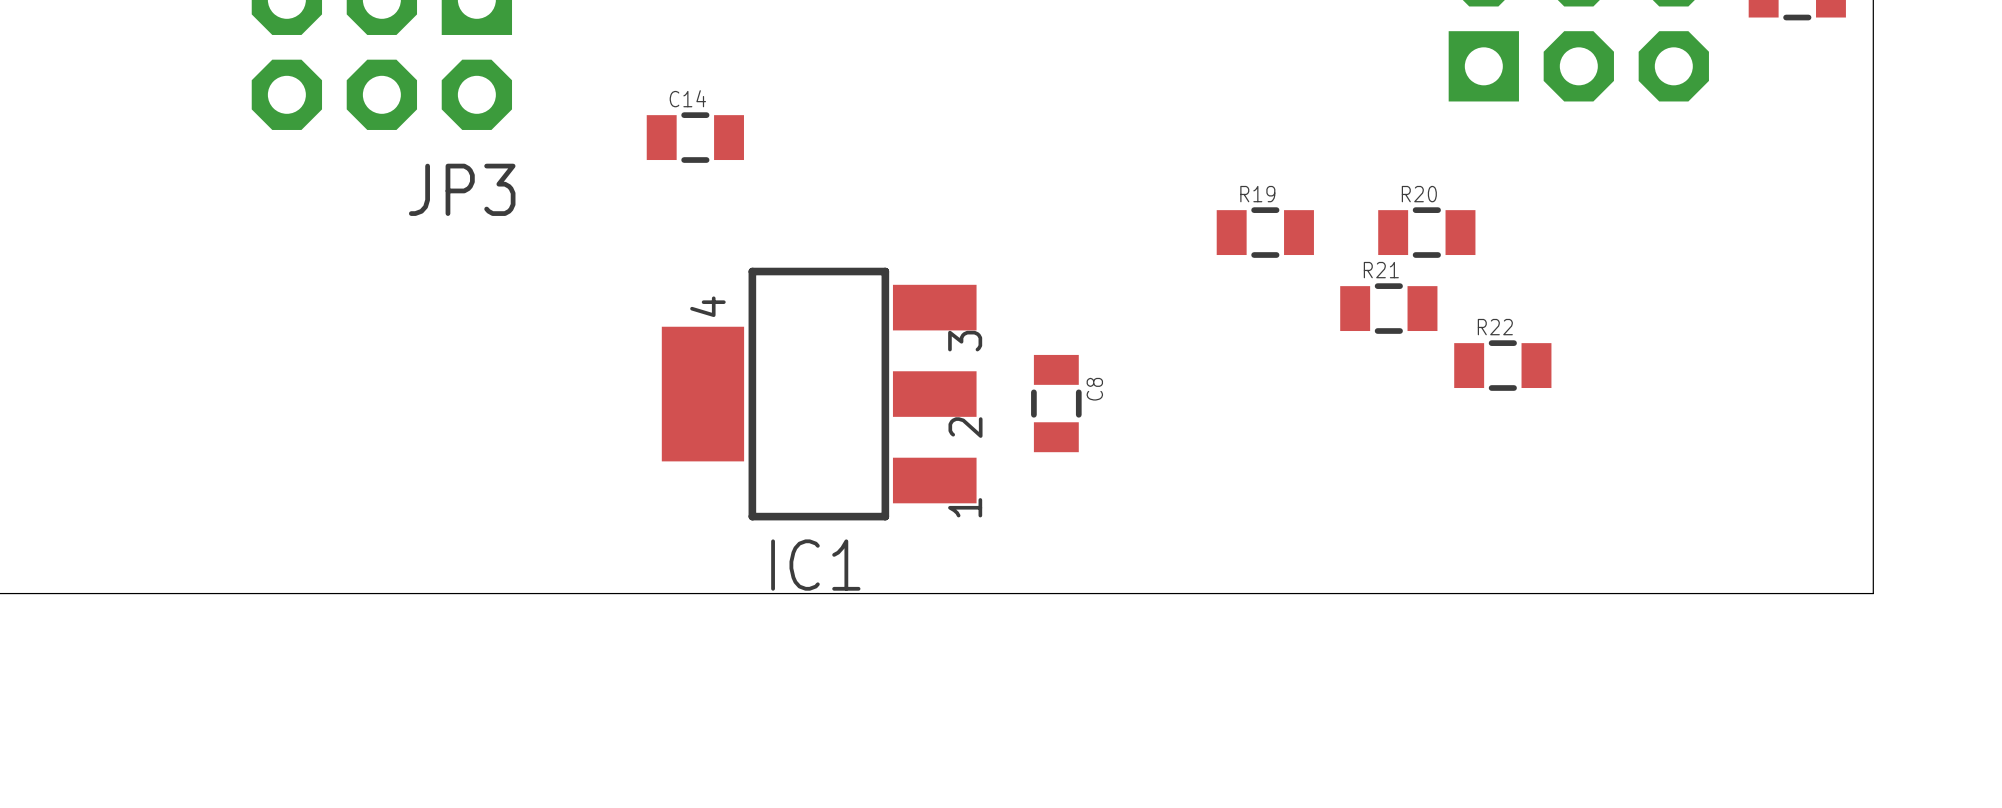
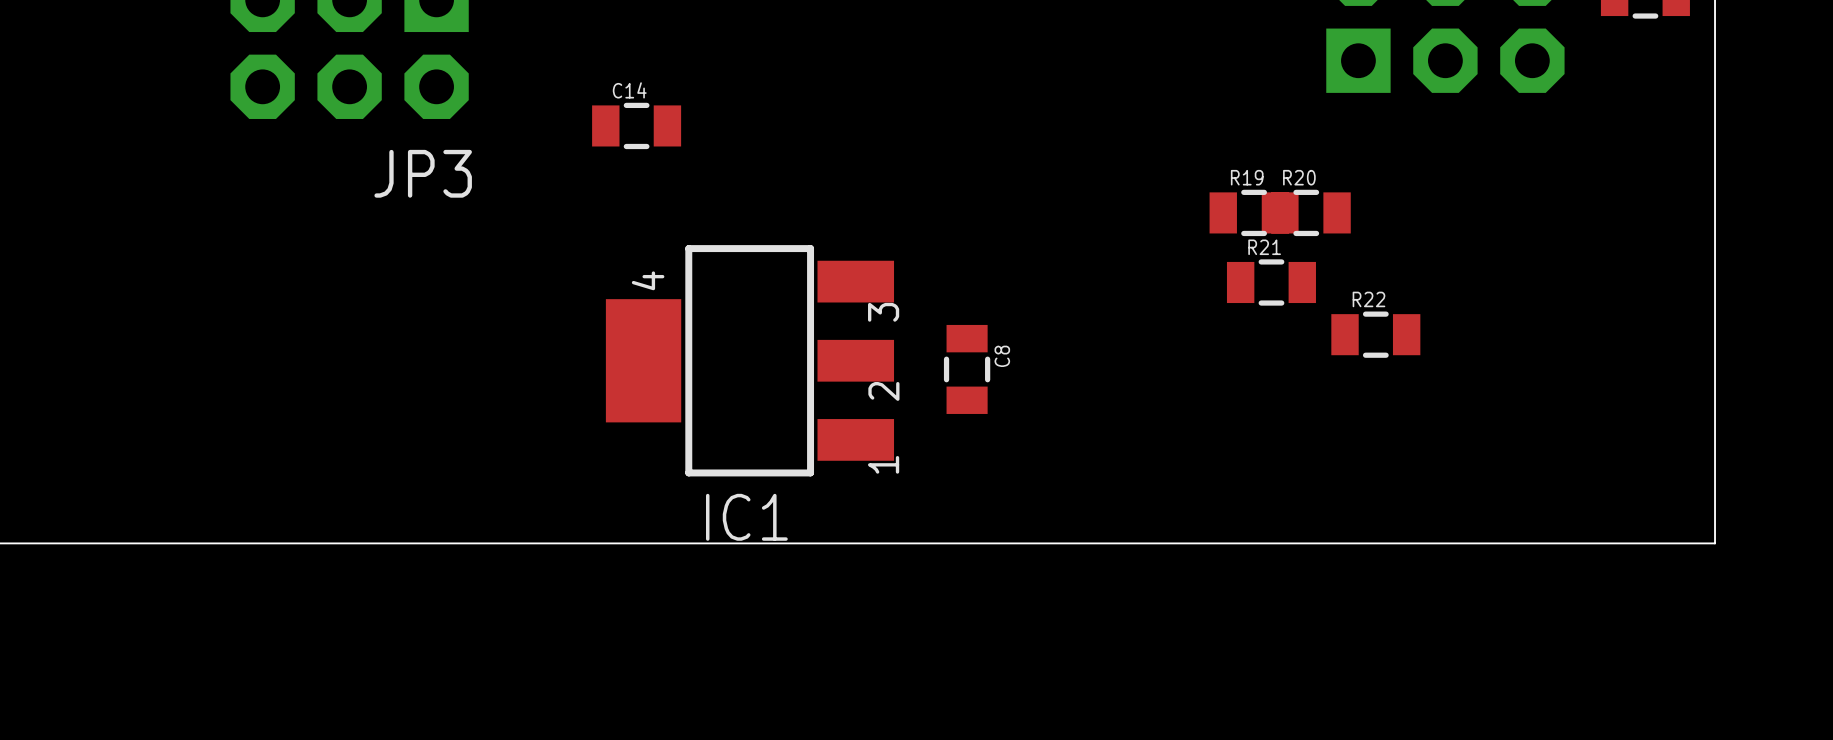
R19 position: (1265, 232) -> (1254, 212)

